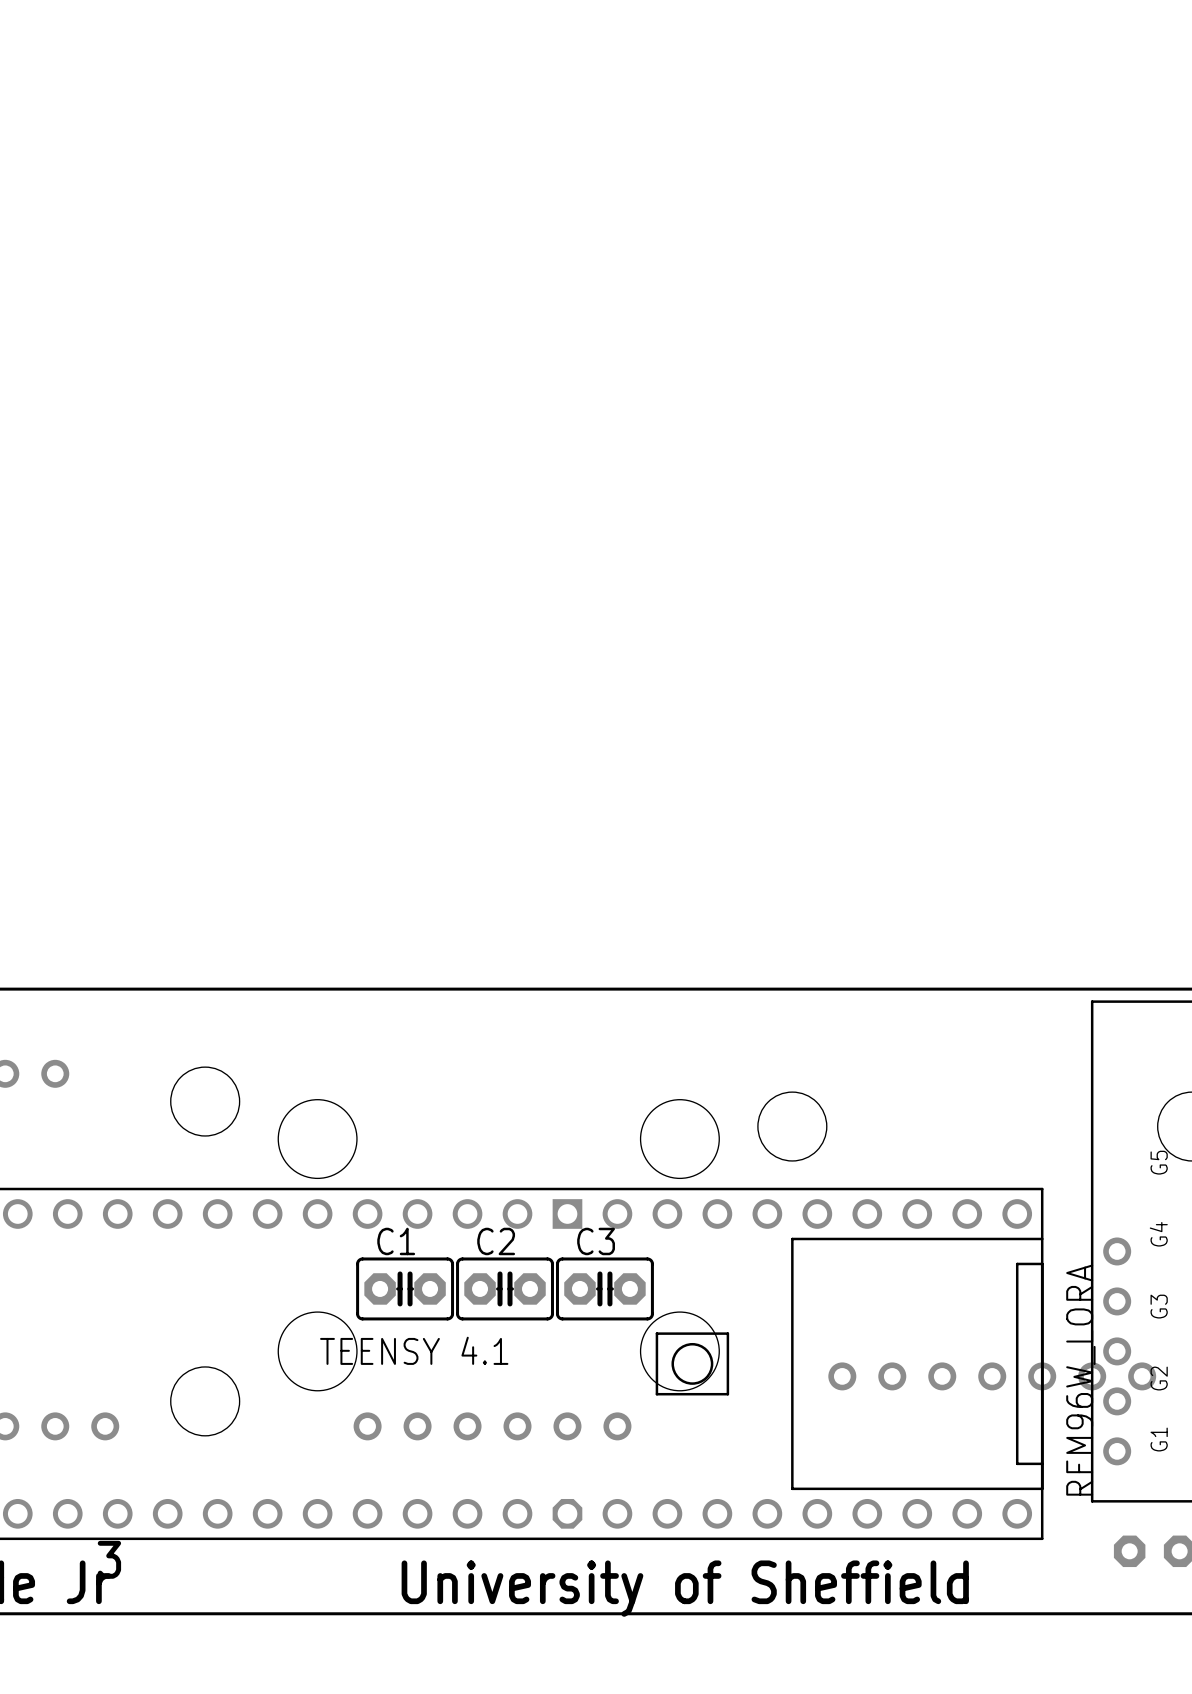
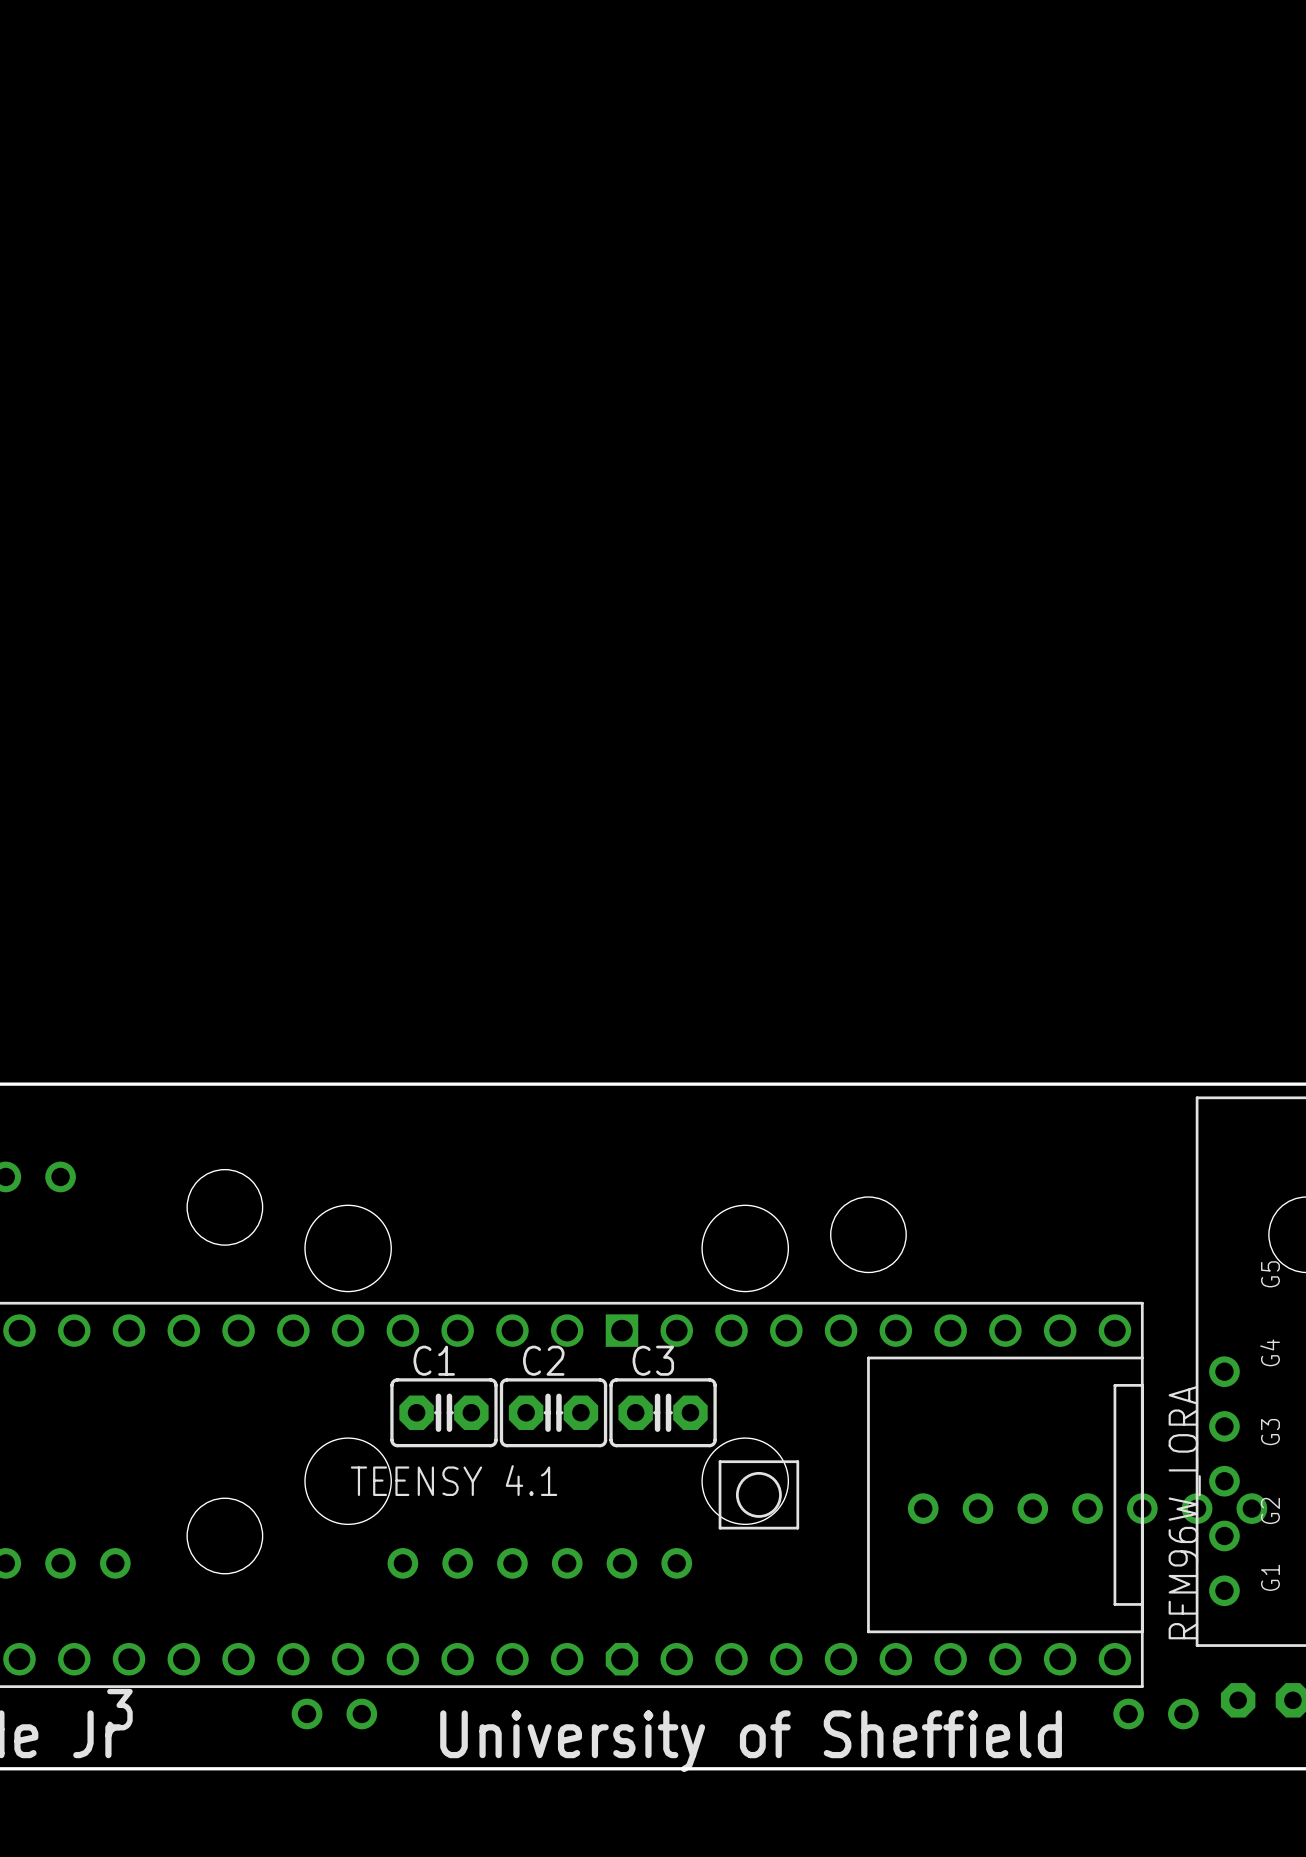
part: none -> (307, 1714)
part: none -> (361, 1714)
part: none -> (1128, 1714)
part: none -> (1183, 1714)

